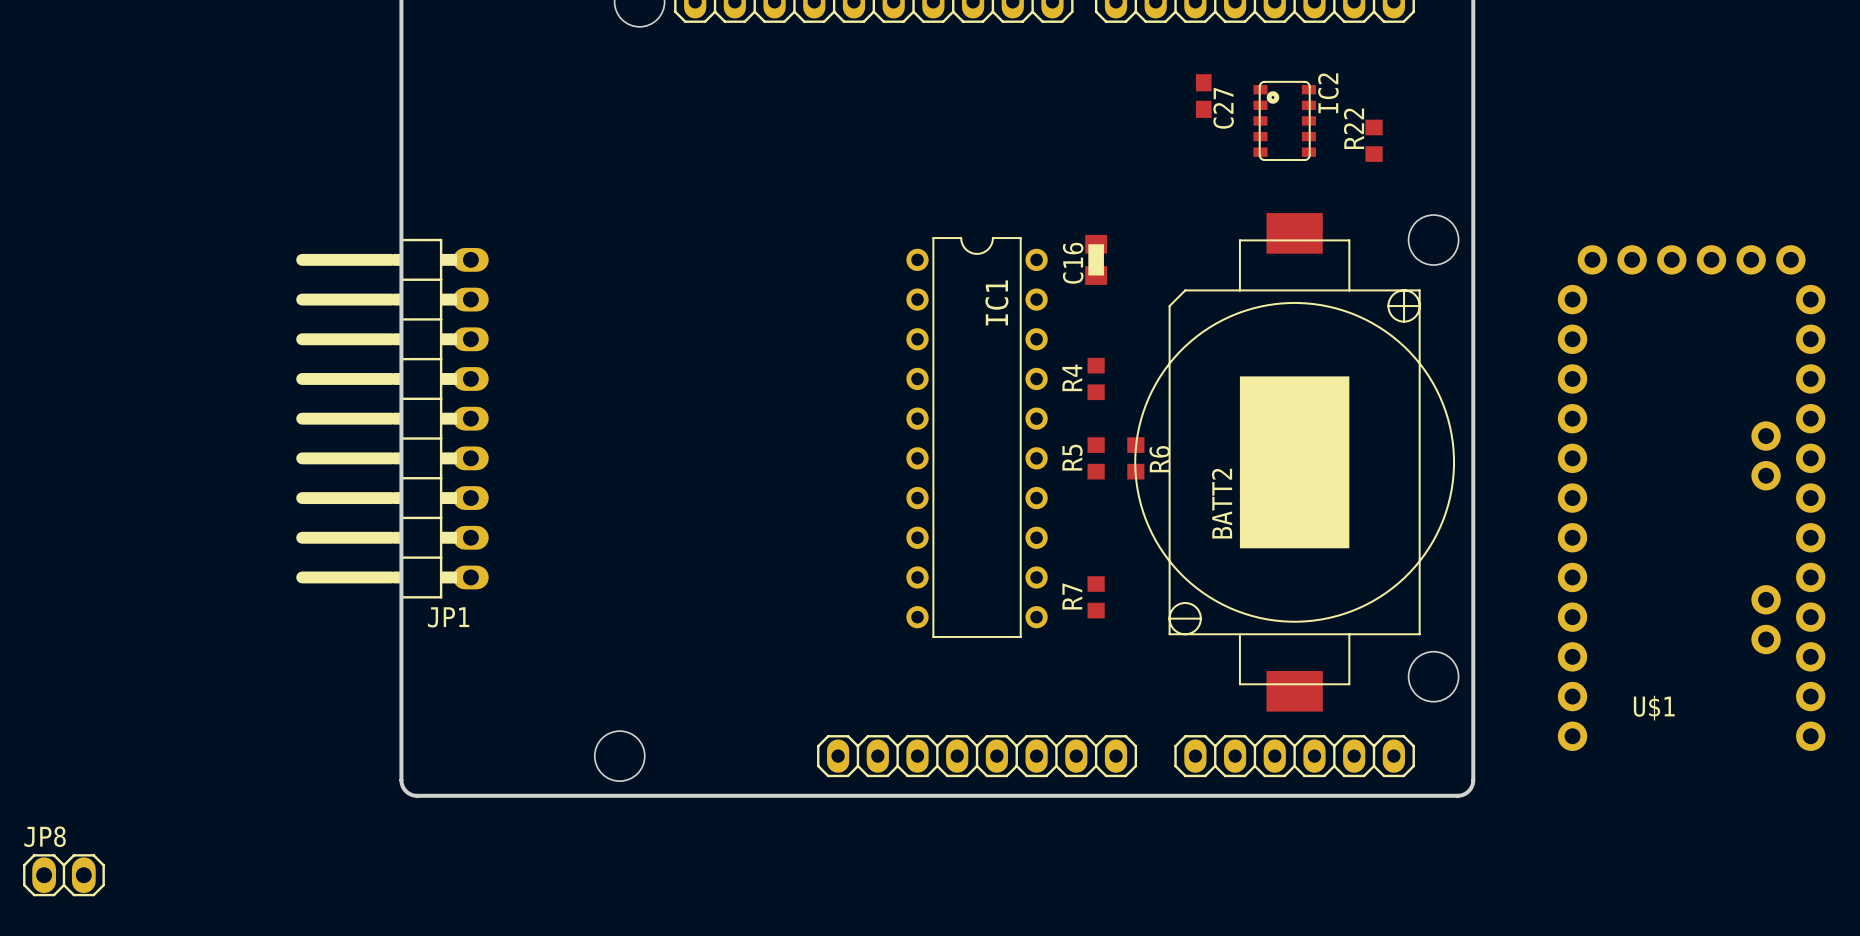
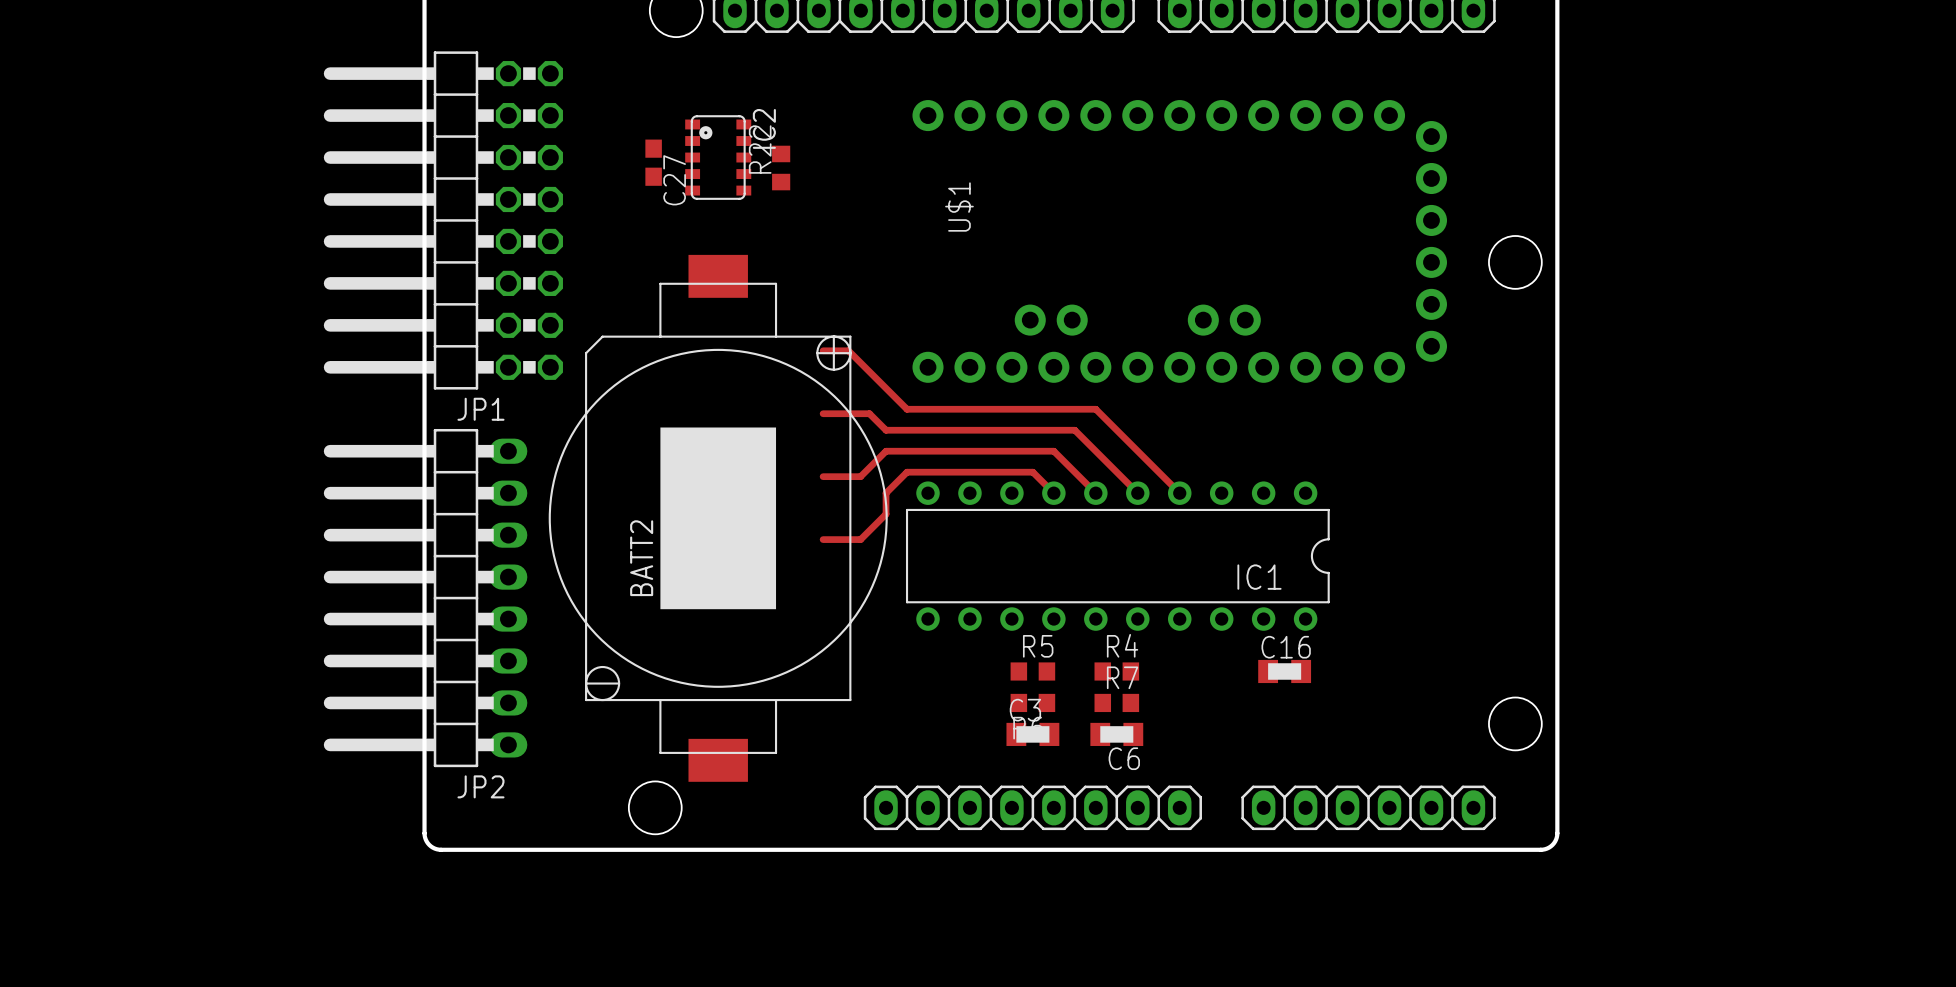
C27 position: (1203, 96) -> (653, 162)
IC2 position: (1284, 120) -> (718, 157)
R22 position: (1374, 140) -> (781, 168)
JP1 footprint: [296, 238, 489, 599] -> [323, 51, 563, 390]
C16 rotation: 0° (1096, 259) -> 90° clockwise (1284, 671)
C16 position: (1096, 259) -> (1284, 671)
track: none -> (823, 350) (848, 350) (907, 409) (1095, 409) (1179, 493)
R4 rotation: 0° (1096, 378) -> 90° clockwise (1116, 671)
R4 position: (1096, 378) -> (1116, 671)
track: none -> (823, 413) (869, 413) (886, 430) (1074, 430) (1137, 493)
IC1 rotation: 0° (977, 437) -> 90° clockwise (1117, 556)
track: none -> (823, 476) (860, 476) (886, 451) (1053, 451) (1095, 493)
track: none -> (1053, 493) (1032, 472) (907, 472) (886, 493) (886, 514) (860, 539) (823, 539)
R5 rotation: 0° (1096, 458) -> 90° clockwise (1032, 671)
R5 position: (1096, 458) -> (1032, 671)
R6 rotation: 0° (1135, 458) -> 90° clockwise (1032, 702)
R6 position: (1135, 458) -> (1032, 702)
BATT2 position: (1294, 462) -> (718, 518)
U$1 rotation: 0° (1691, 498) -> 90° clockwise (1179, 241)
U$1 position: (1691, 498) -> (1179, 241)
JP2: none -> (425, 598)
R7 rotation: 0° (1096, 597) -> 90° clockwise (1116, 702)
R7 position: (1096, 597) -> (1116, 702)
C3: none -> (1032, 734)
C6: none -> (1116, 734)
JP8: (63, 875) -> none

